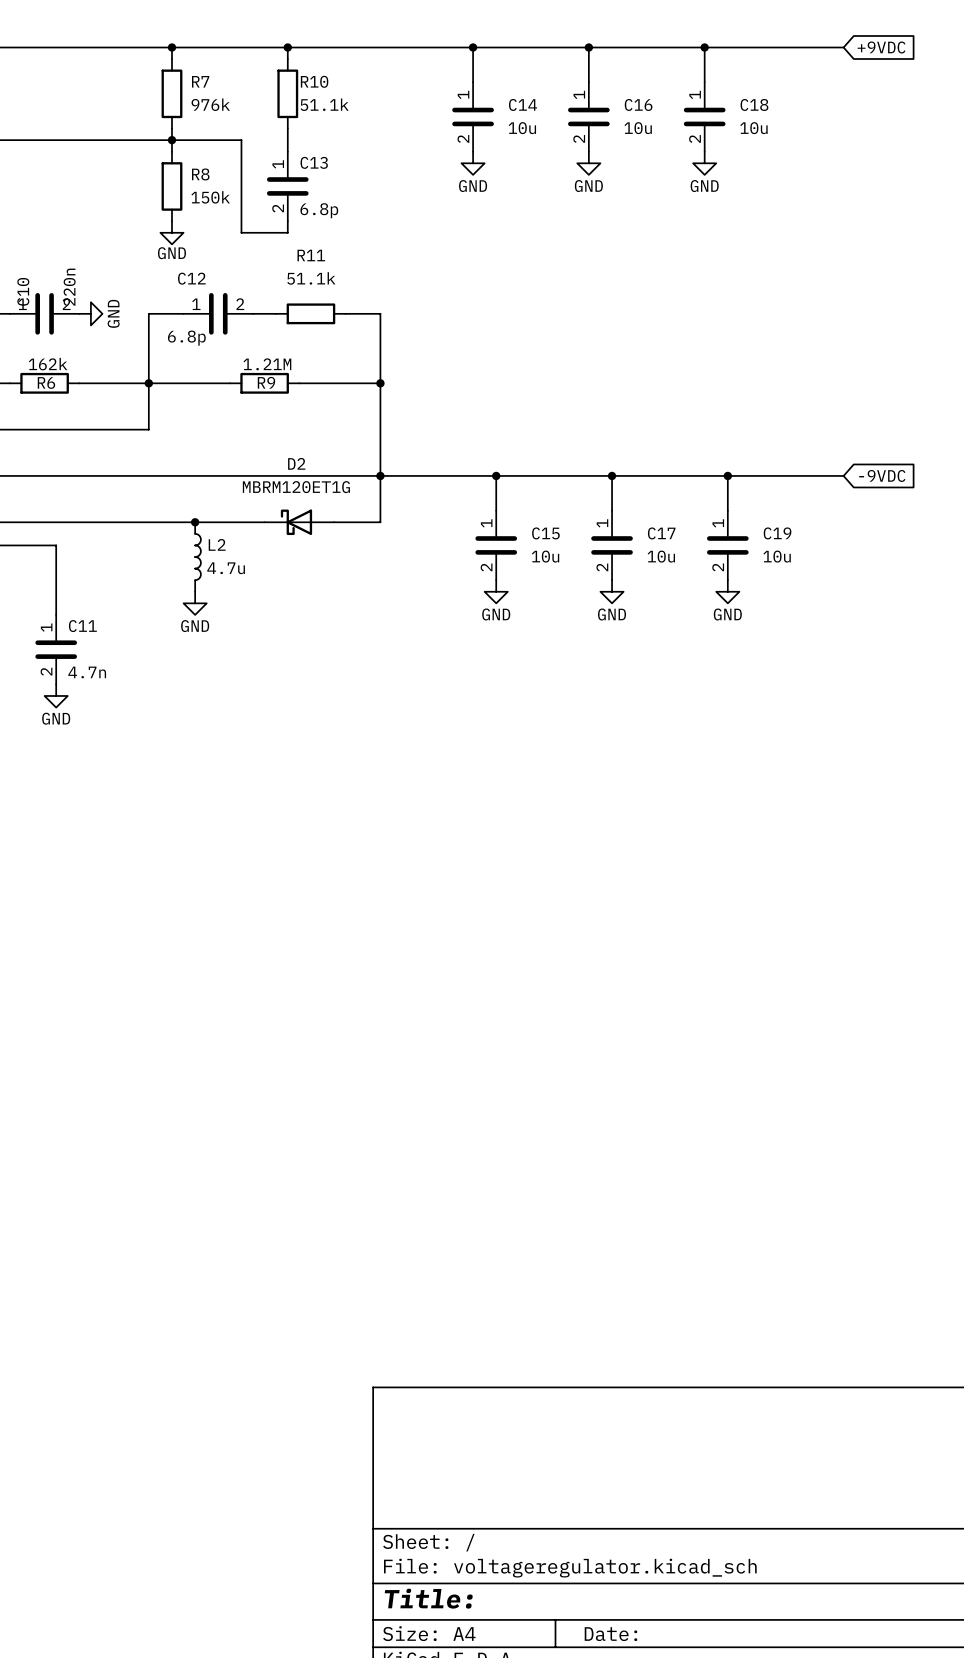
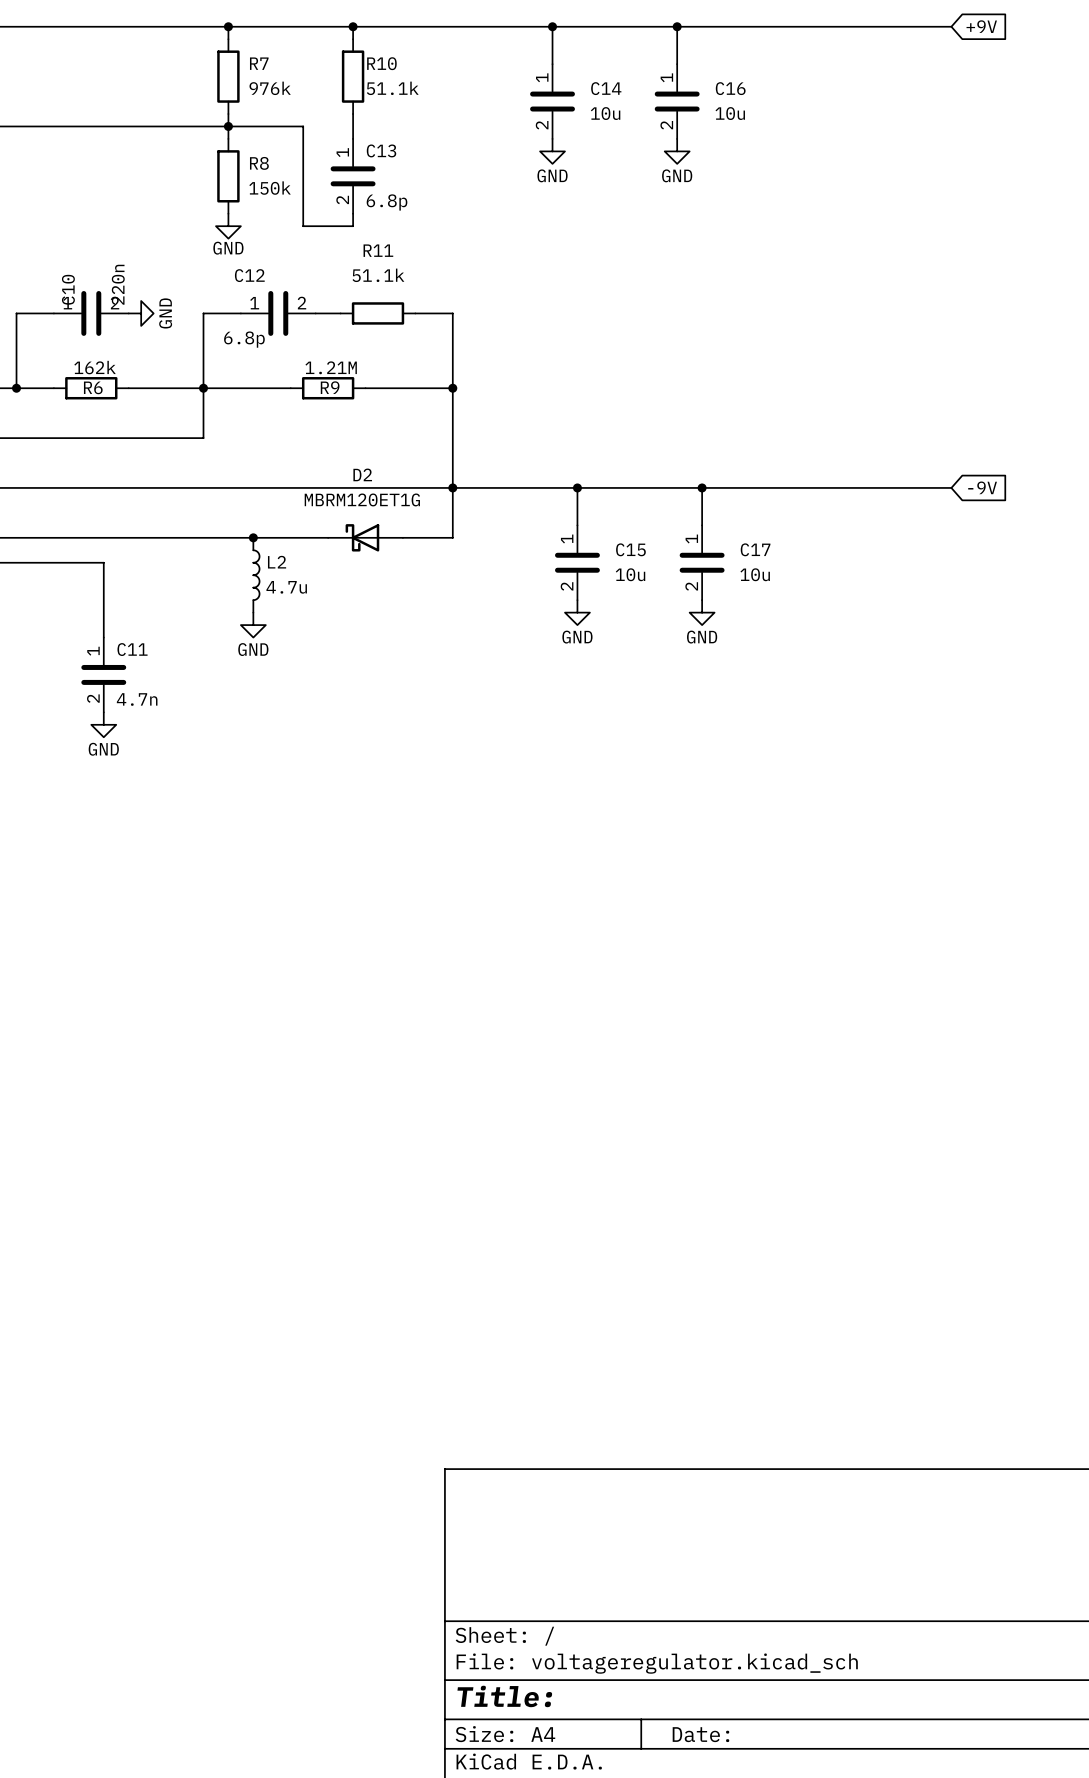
wire: (704, 47) (704, 82) -> none
junction: (704, 47) -> none
global label: +9VDC (881, 47) -> +9V (981, 26)
C18: 10u (704, 116) -> none
power symbol: GND (704, 163) -> none
wire: (727, 475) (727, 510) -> none
junction: (727, 475) -> none
global label: -9VDC (882, 475) -> -9V (982, 487)
C19: 10u (727, 545) -> none
power symbol: GND (727, 591) -> none

